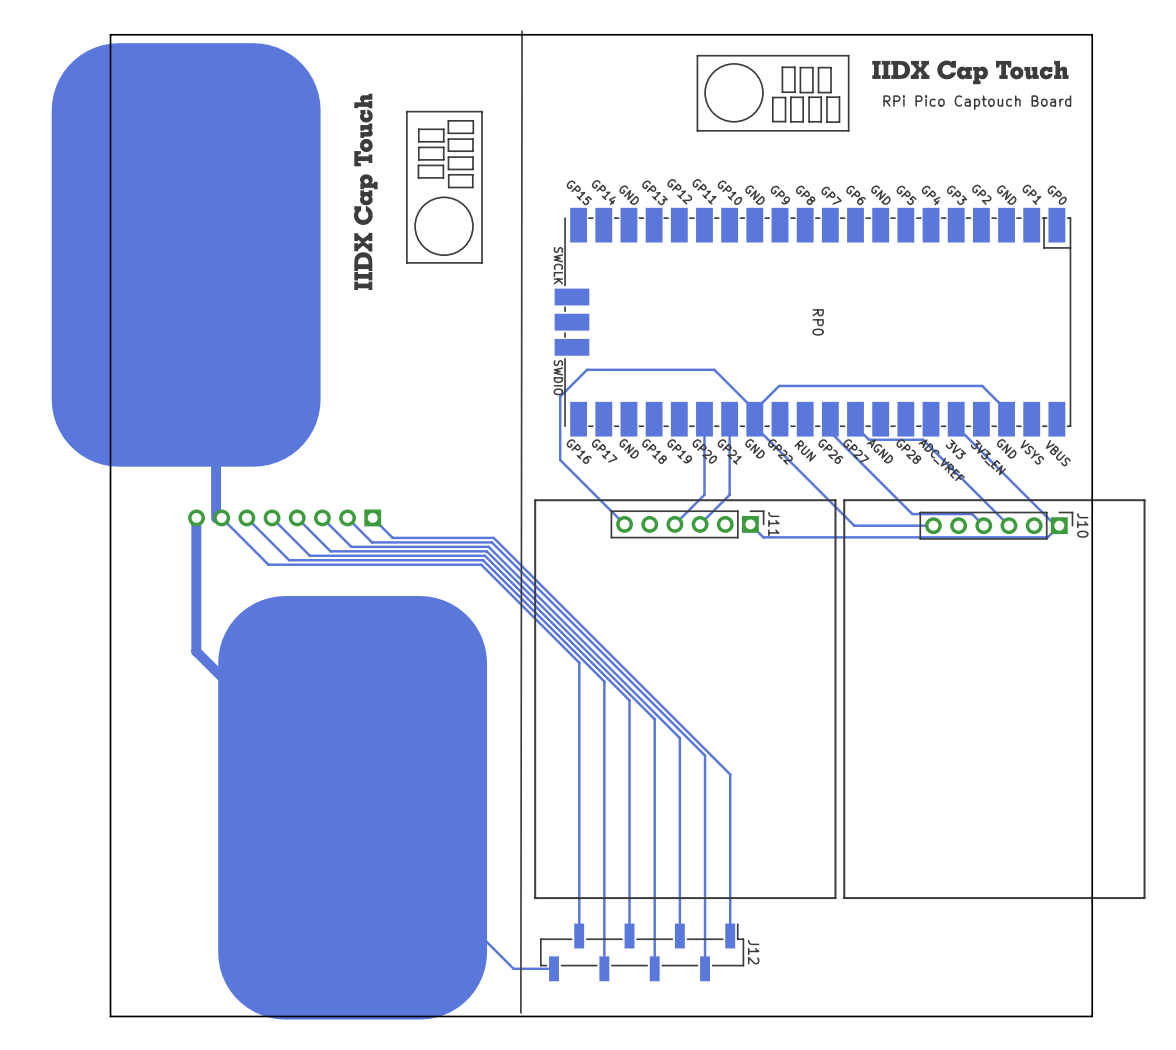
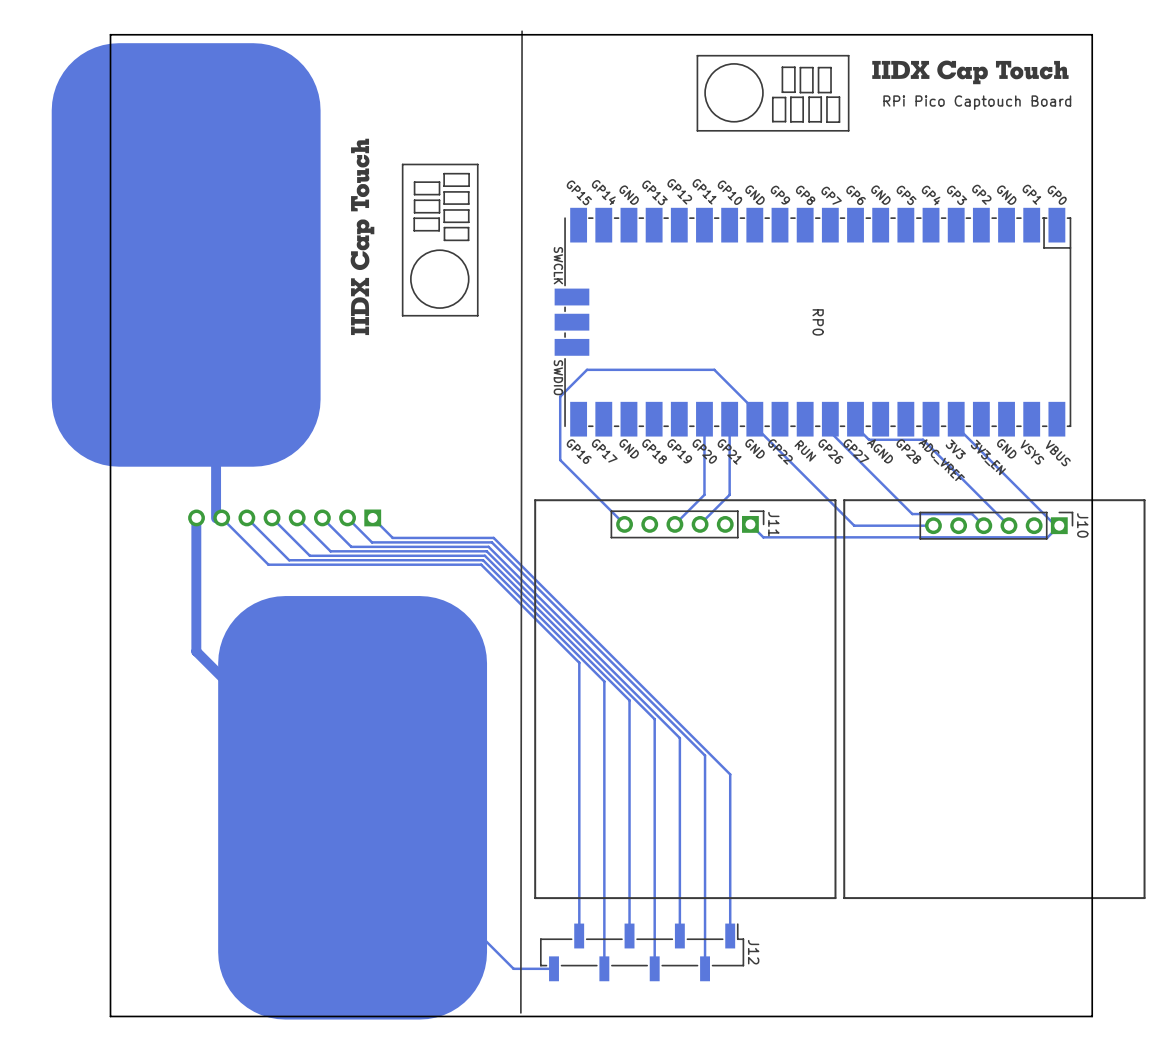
line: (481, 111) (406, 111) (406, 262) (481, 262) (481, 111) -> (477, 164) (402, 164) (402, 315) (477, 315) (477, 164)
line: (473, 120) (448, 120) (448, 133) (473, 133) (473, 120) -> (469, 173) (444, 173) (444, 186) (469, 186) (469, 173)
line: (443, 129) (418, 129) (418, 141) (443, 141) (443, 129) -> (439, 182) (414, 182) (414, 194) (439, 194) (439, 182)
line: (472, 139) (448, 139) (448, 151) (472, 151) (472, 139) -> (468, 191) (444, 191) (444, 204) (468, 204) (468, 191)
line: (443, 147) (443, 159) (418, 159) (418, 147) (443, 147) -> (439, 200) (439, 212) (414, 212) (414, 200) (439, 200)
line: (472, 157) (472, 169) (448, 169) (448, 157) (472, 157) -> (468, 209) (468, 222) (444, 222) (444, 209) (468, 209)
line: (443, 165) (418, 165) (418, 177) (443, 177) (443, 165) -> (439, 218) (414, 218) (414, 230) (439, 230) (439, 218)
line: (472, 174) (448, 174) (448, 187) (472, 187) (472, 174) -> (468, 227) (444, 227) (444, 240) (468, 240) (468, 227)
drawing position: (365, 191) -> (362, 236)
drawing position: (444, 226) -> (439, 279)
track: (1006, 410) (982, 385) (779, 385) (754, 410) -> none

